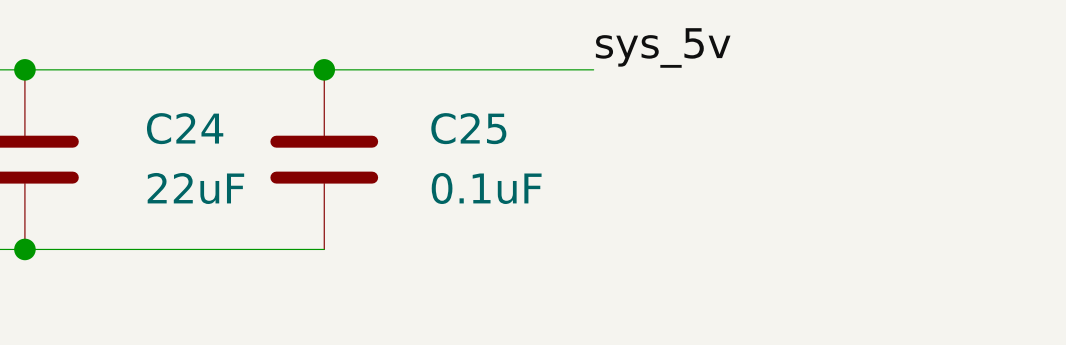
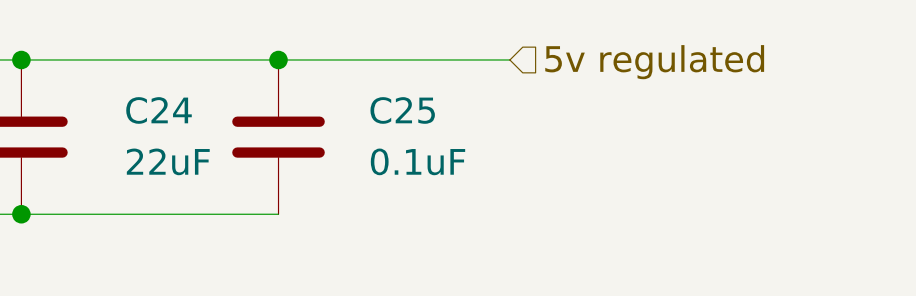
label: sys_5v (663, 47) -> none
hierarchical label: none -> 5v regulated (654, 62)

